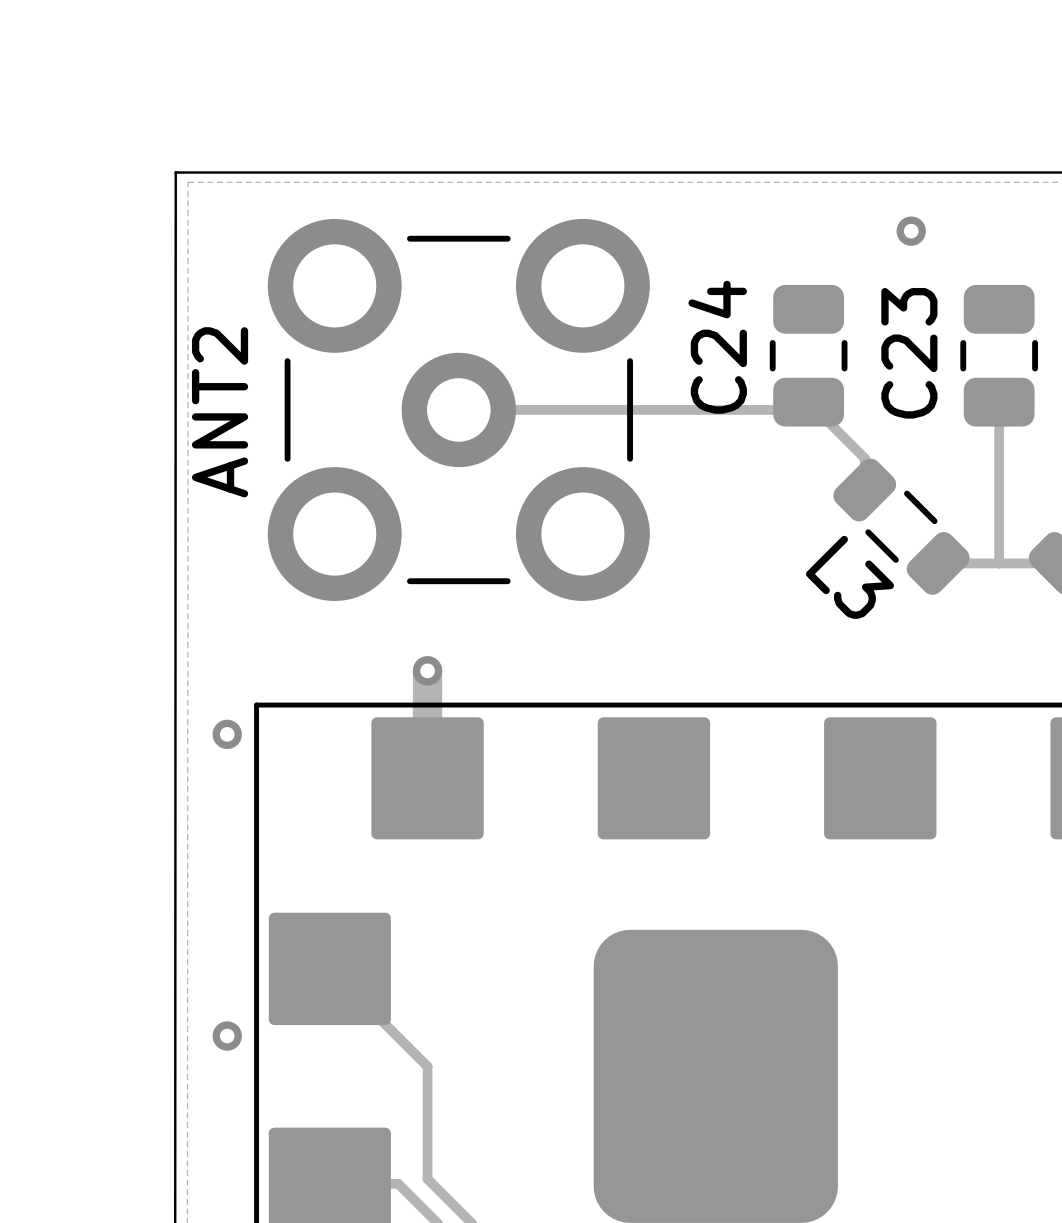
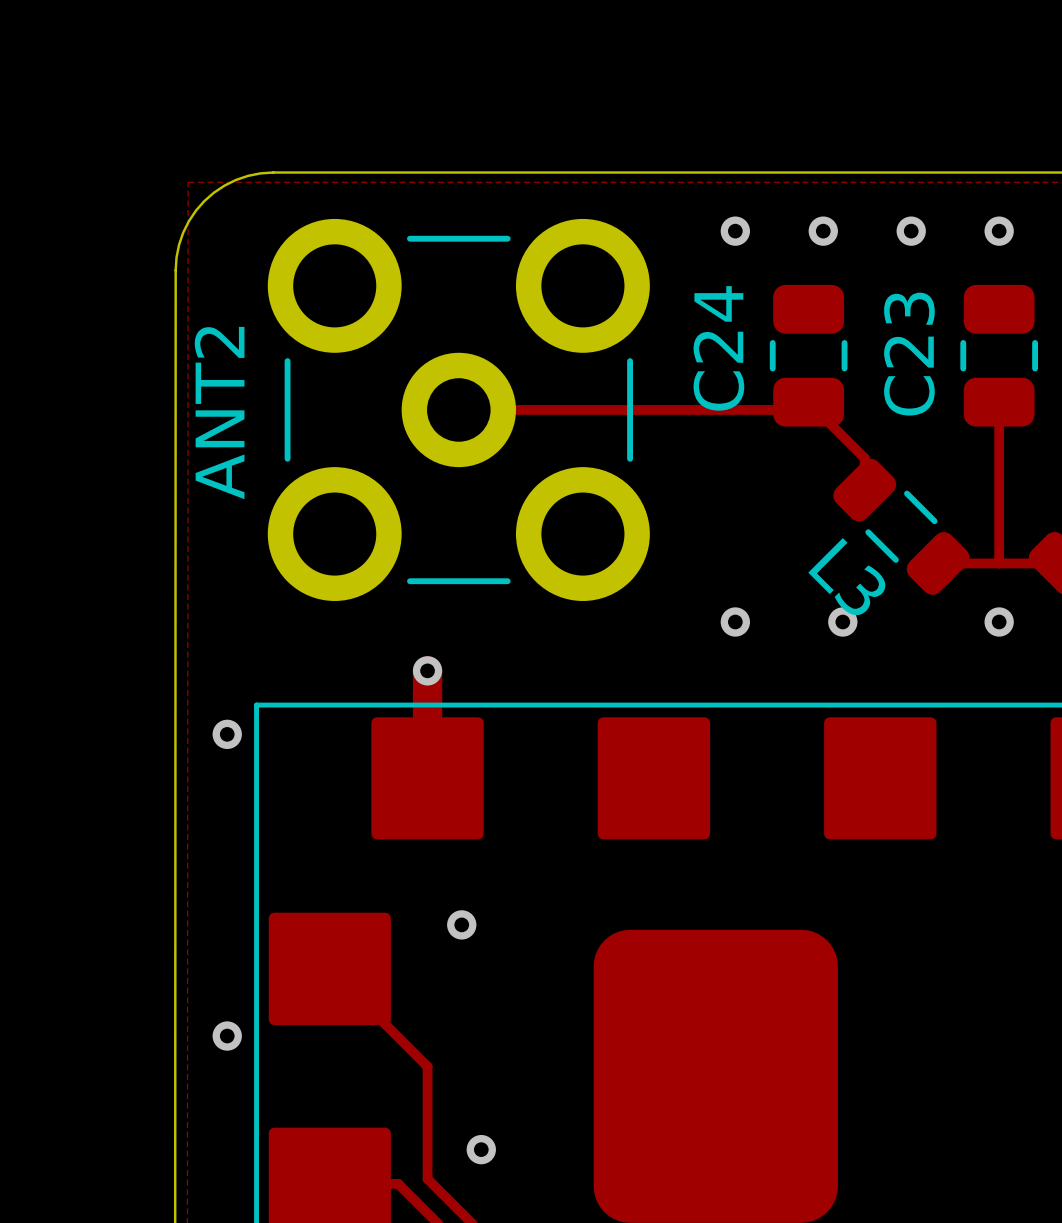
board edge: (273, 172) (175, 172) (175, 270) -> (273, 172) (260, 173) (236, 179) (213, 192) (204, 201) (188, 221) (183, 232) (176, 257) (175, 270)
via: none -> (735, 231)
via: none -> (823, 231)
via: none -> (999, 231)
via: none -> (735, 621)
via: none -> (842, 621)
via: none -> (999, 621)
via: none -> (461, 924)
via: none -> (481, 1149)

